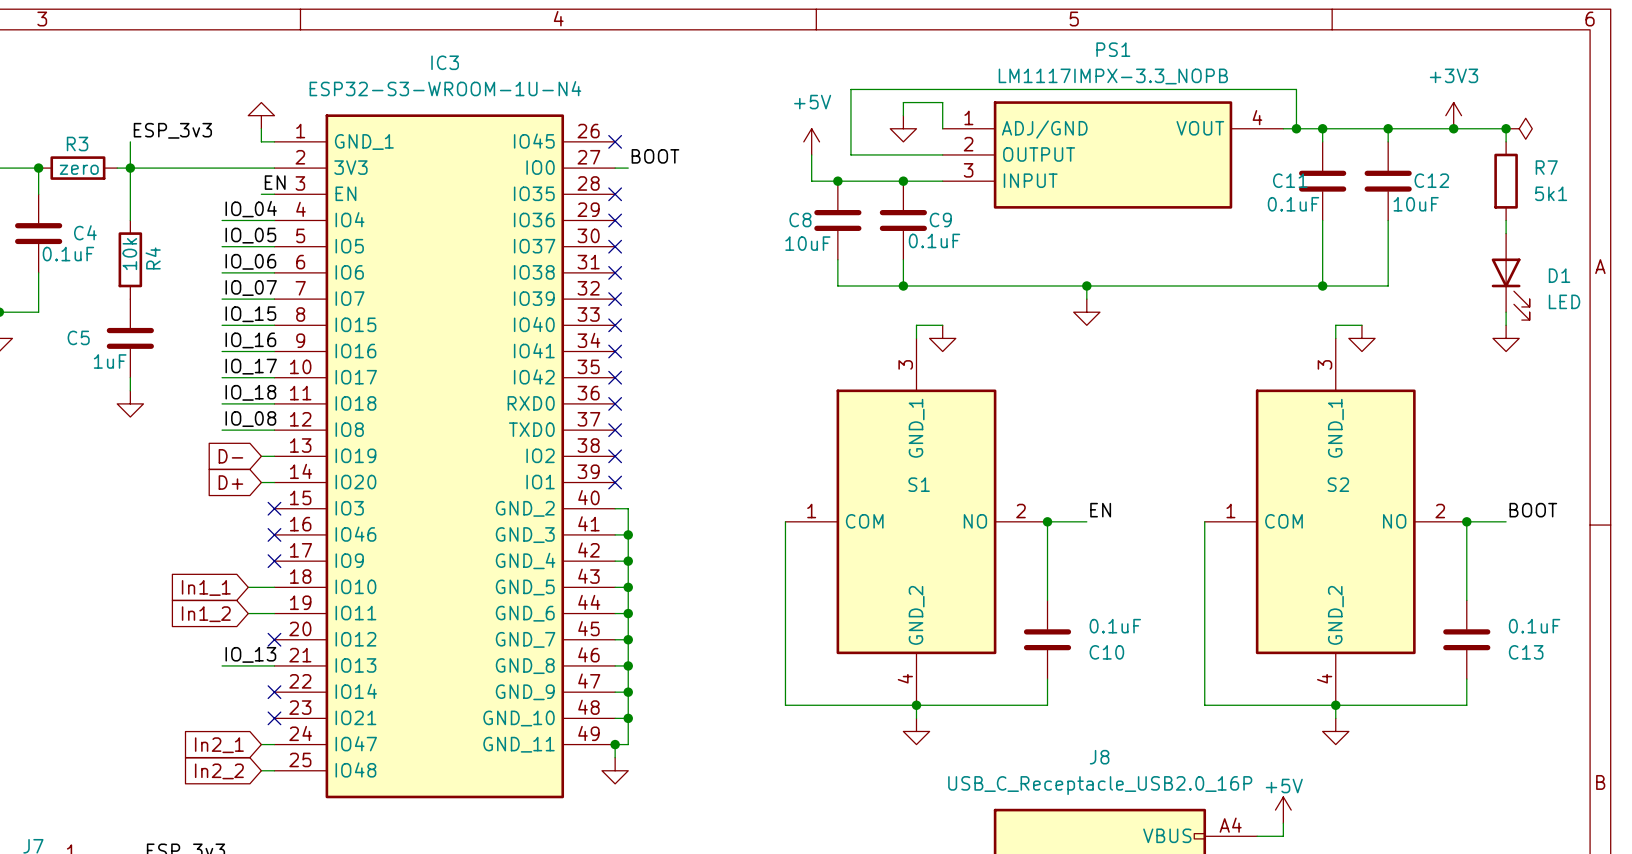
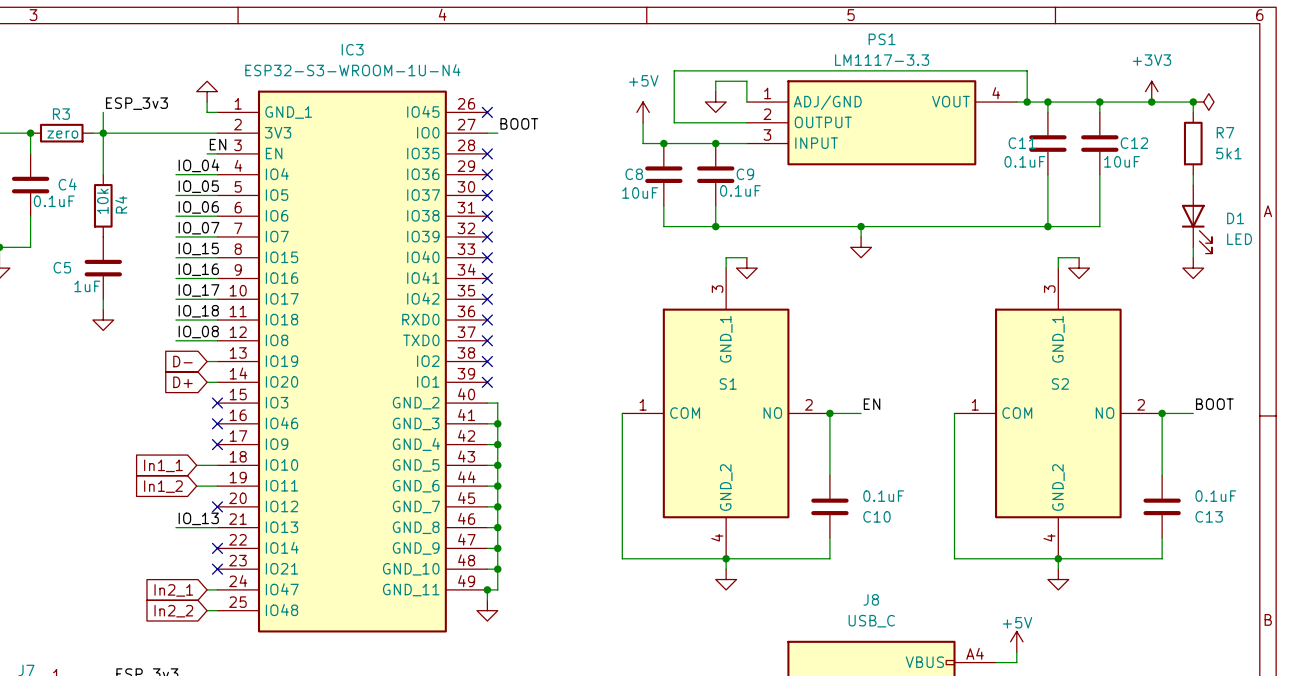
PS1 value: LM1117IMPX-3.3_NOPB (1113, 76) -> LM1117-3.3 (882, 60)
J8 value: USB_C_Receptacle_USB2.0_16P (1100, 785) -> USB_C (871, 621)

